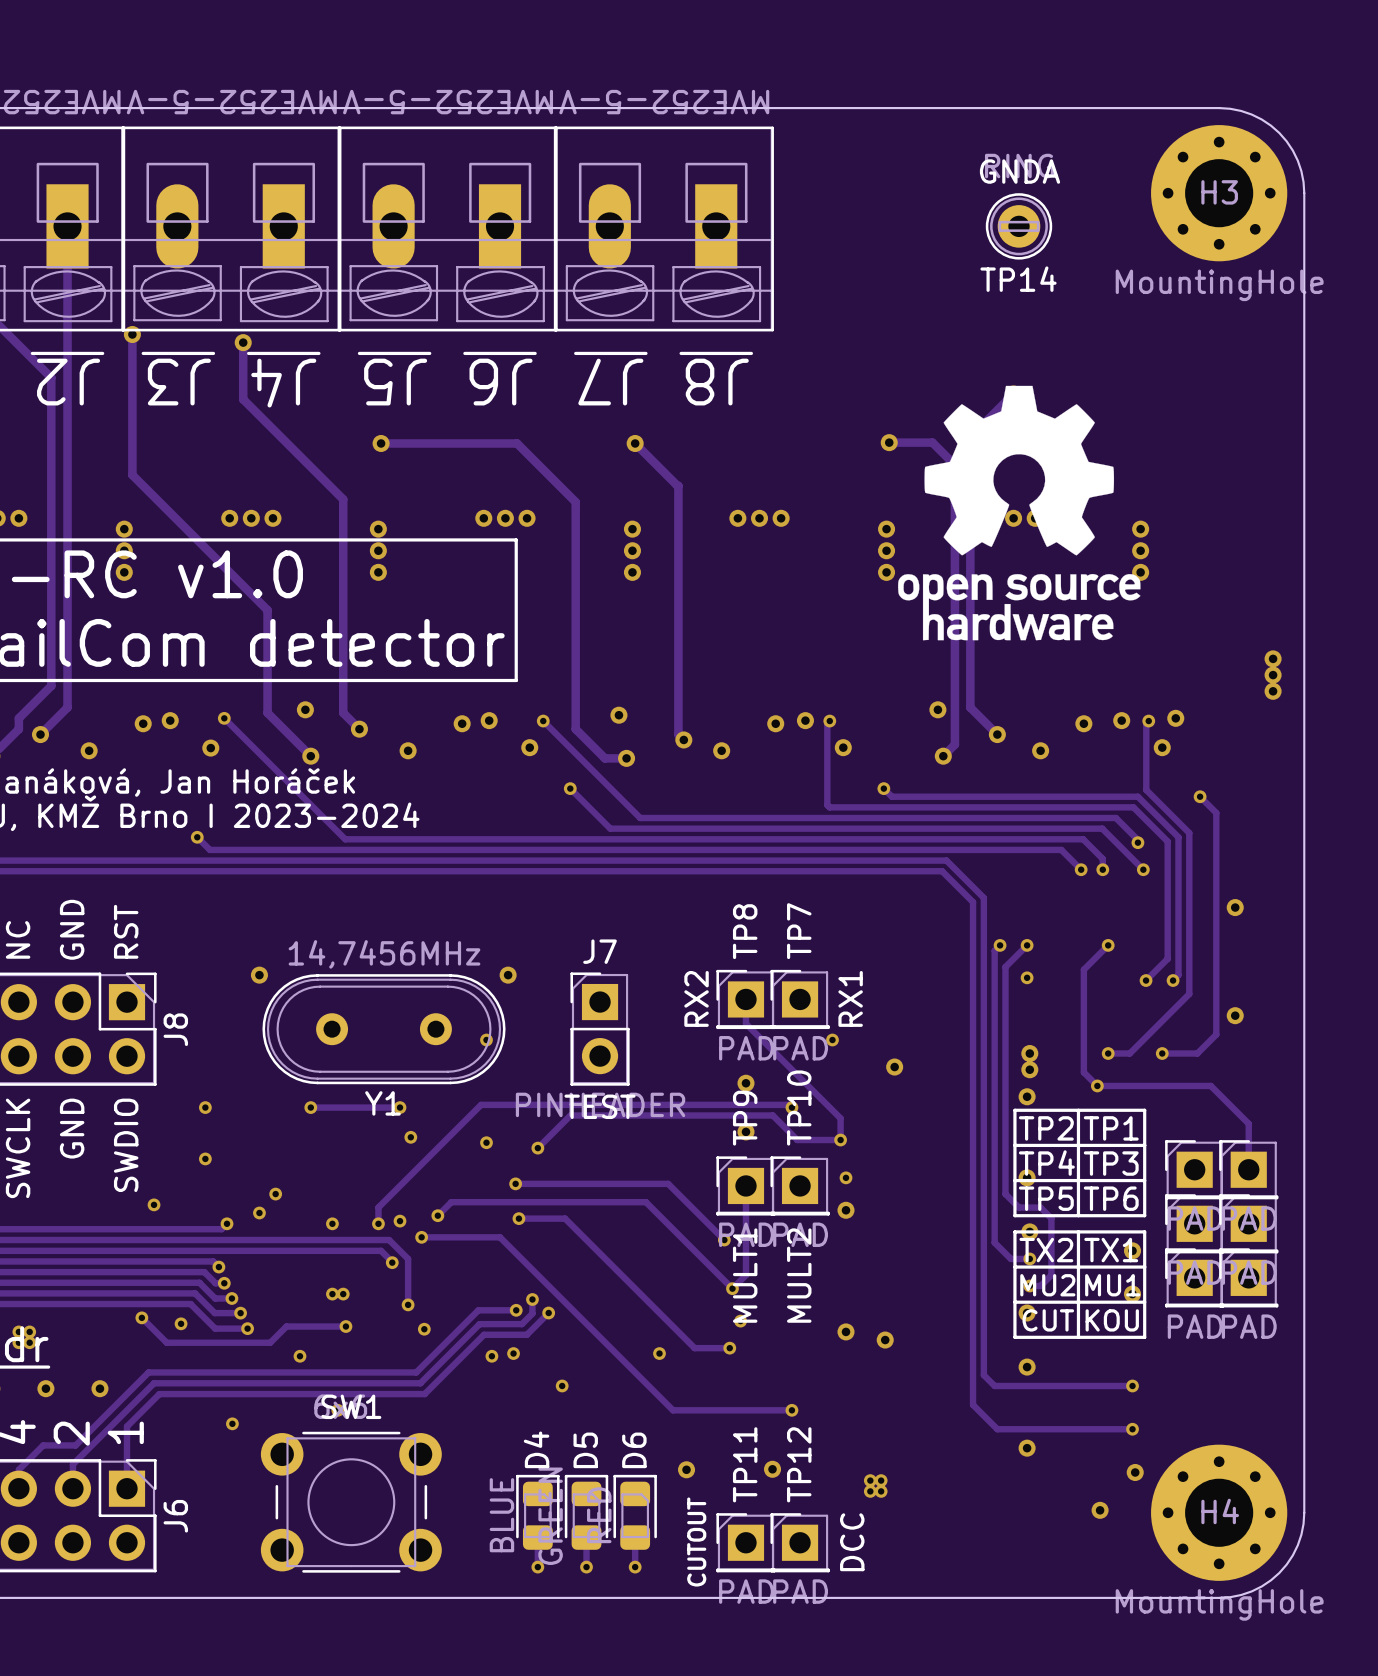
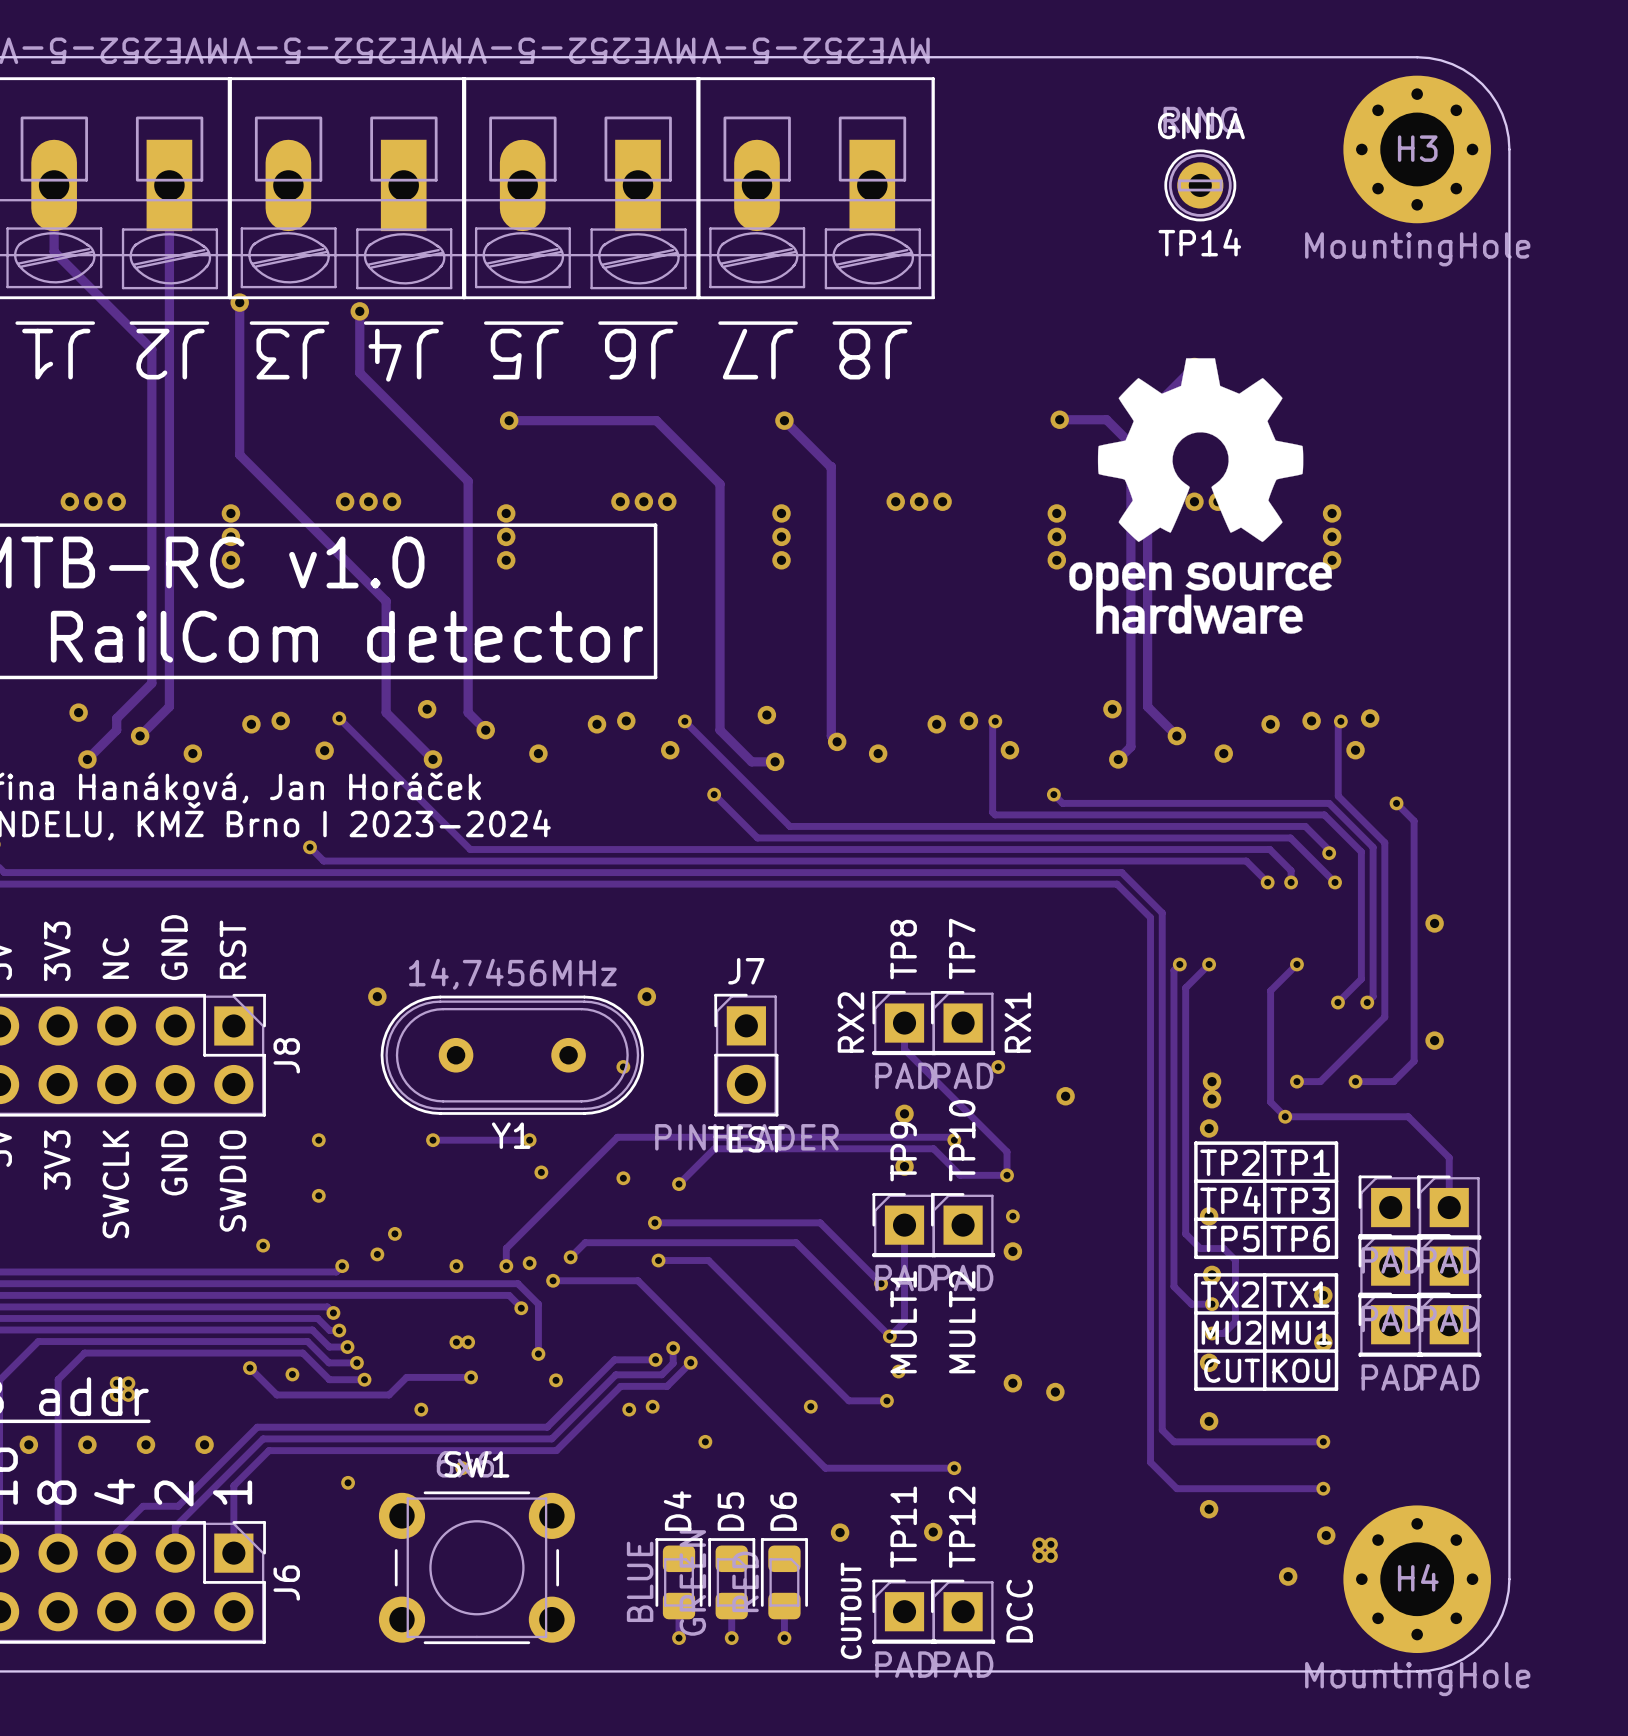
via: (1273, 658) -> none
via: (1273, 675) -> none
via: (1273, 691) -> none
via: (1027, 977) -> none

